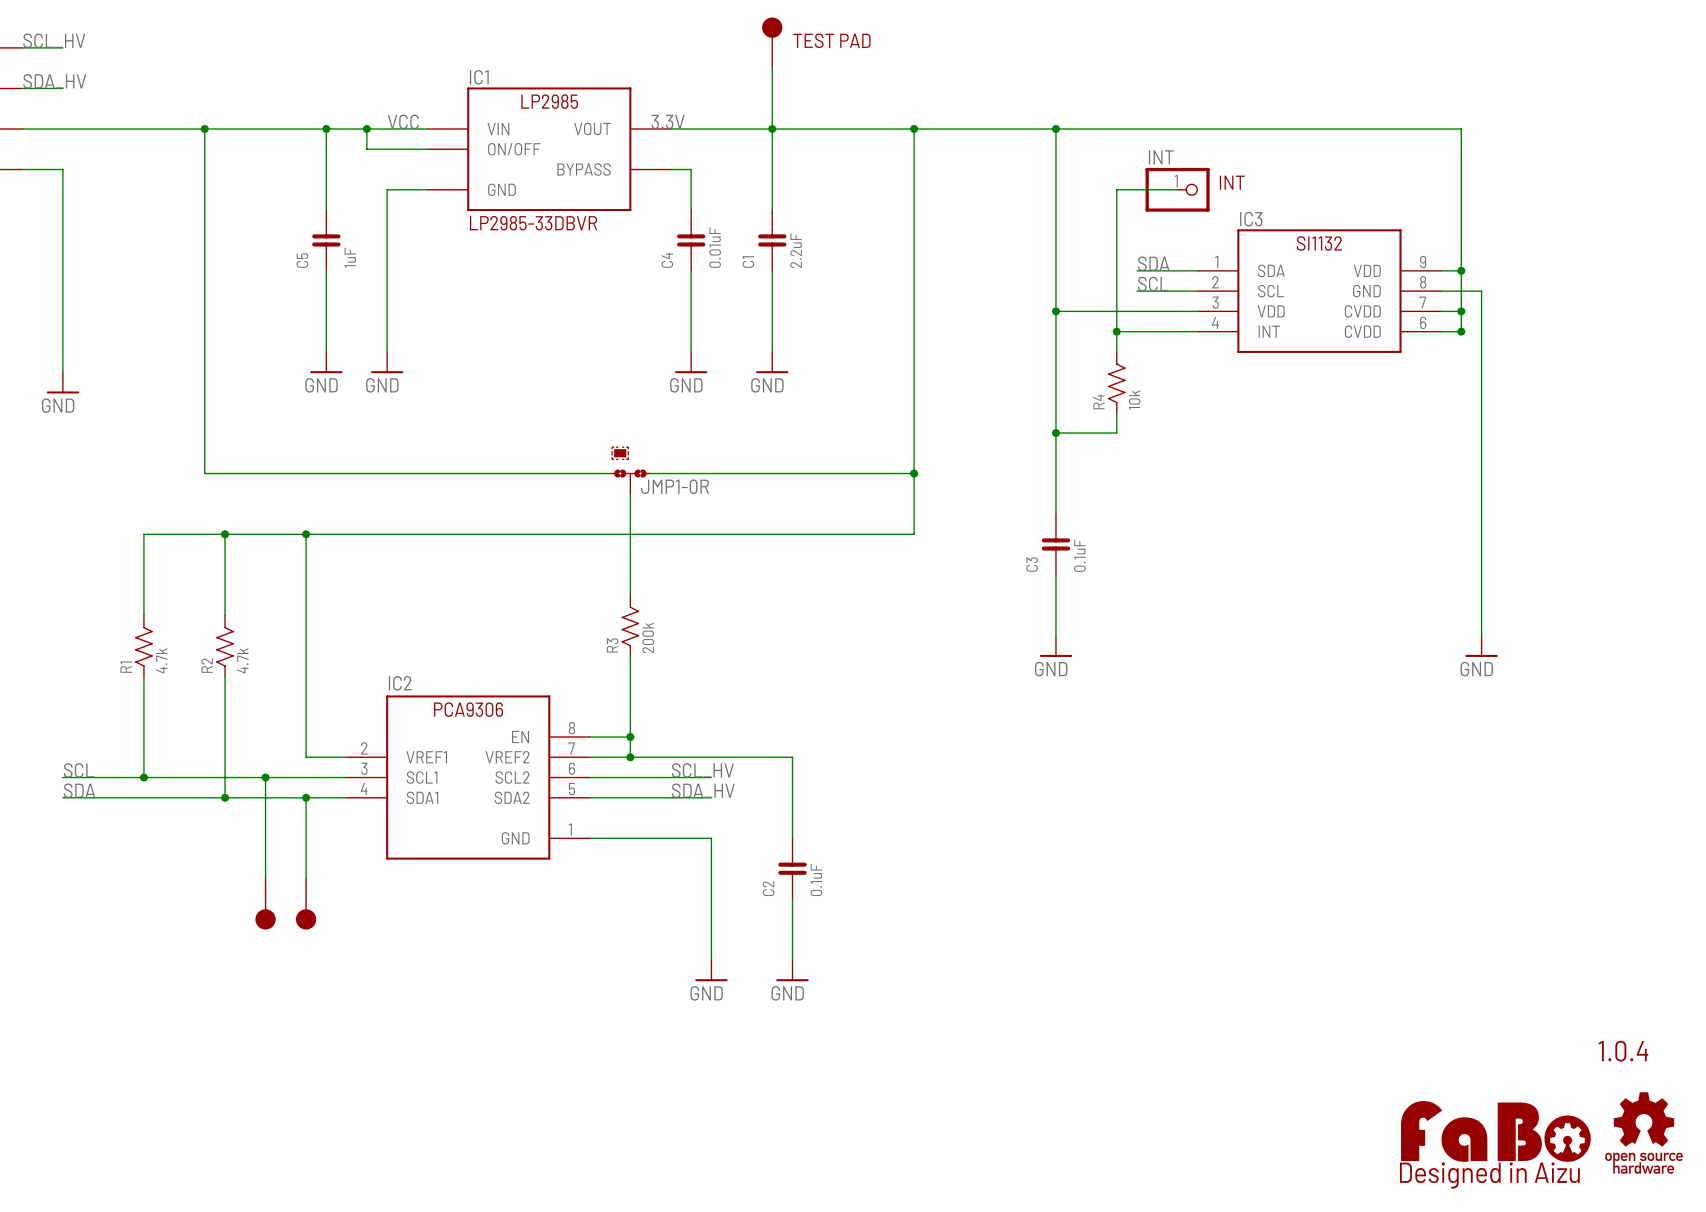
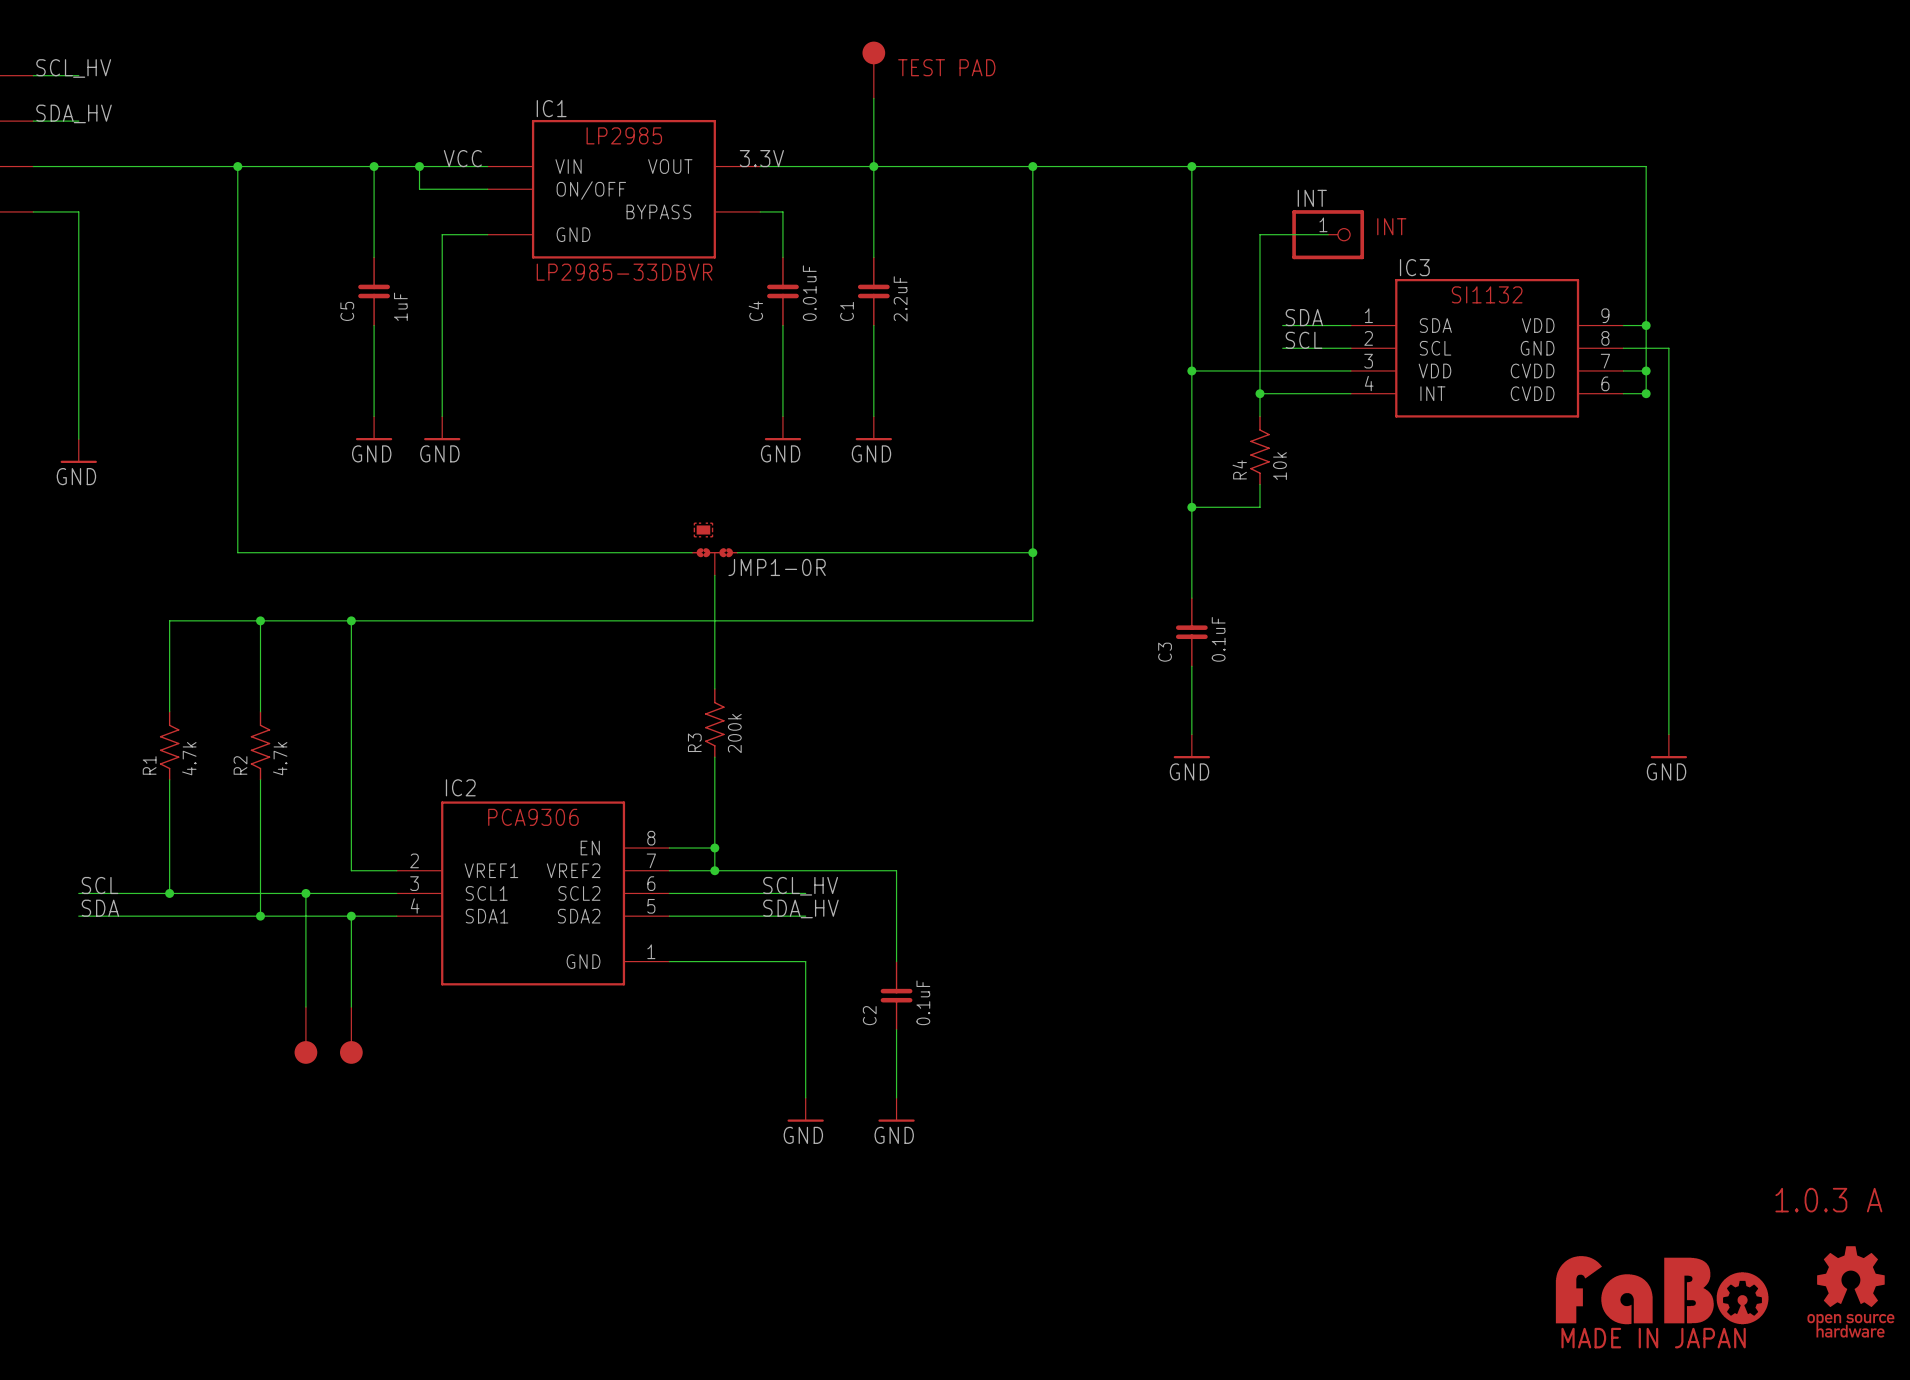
text: 1.0.4 (1623, 1051) -> 1.0.3 A (1828, 1200)
part: none -> (1662, 1290)
part: (1495, 1131) -> none

